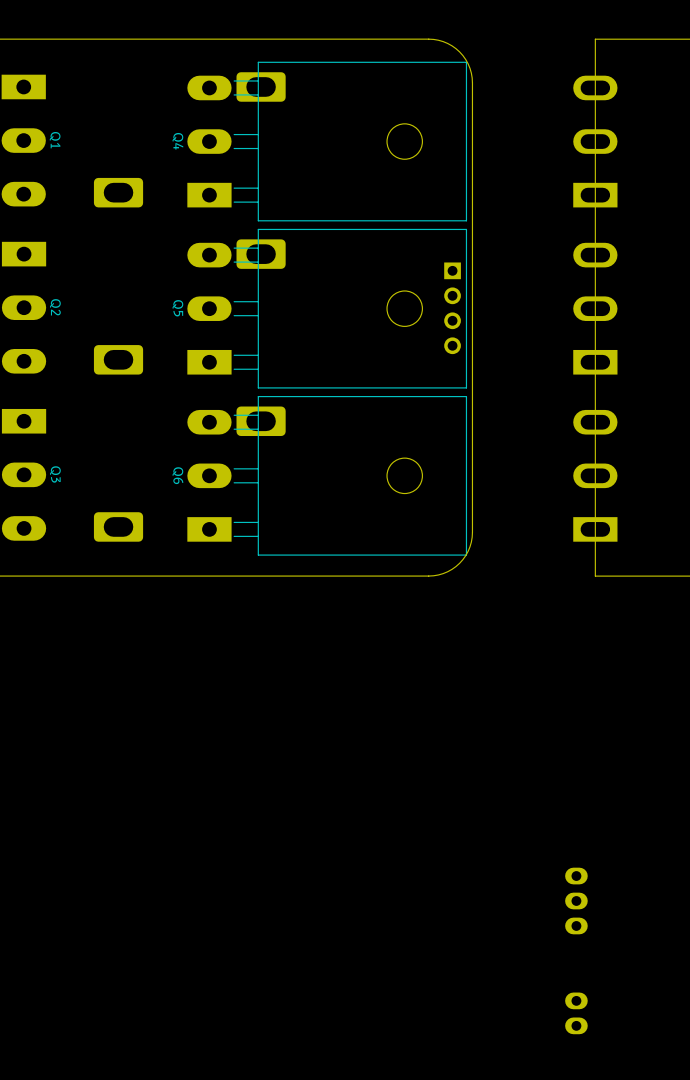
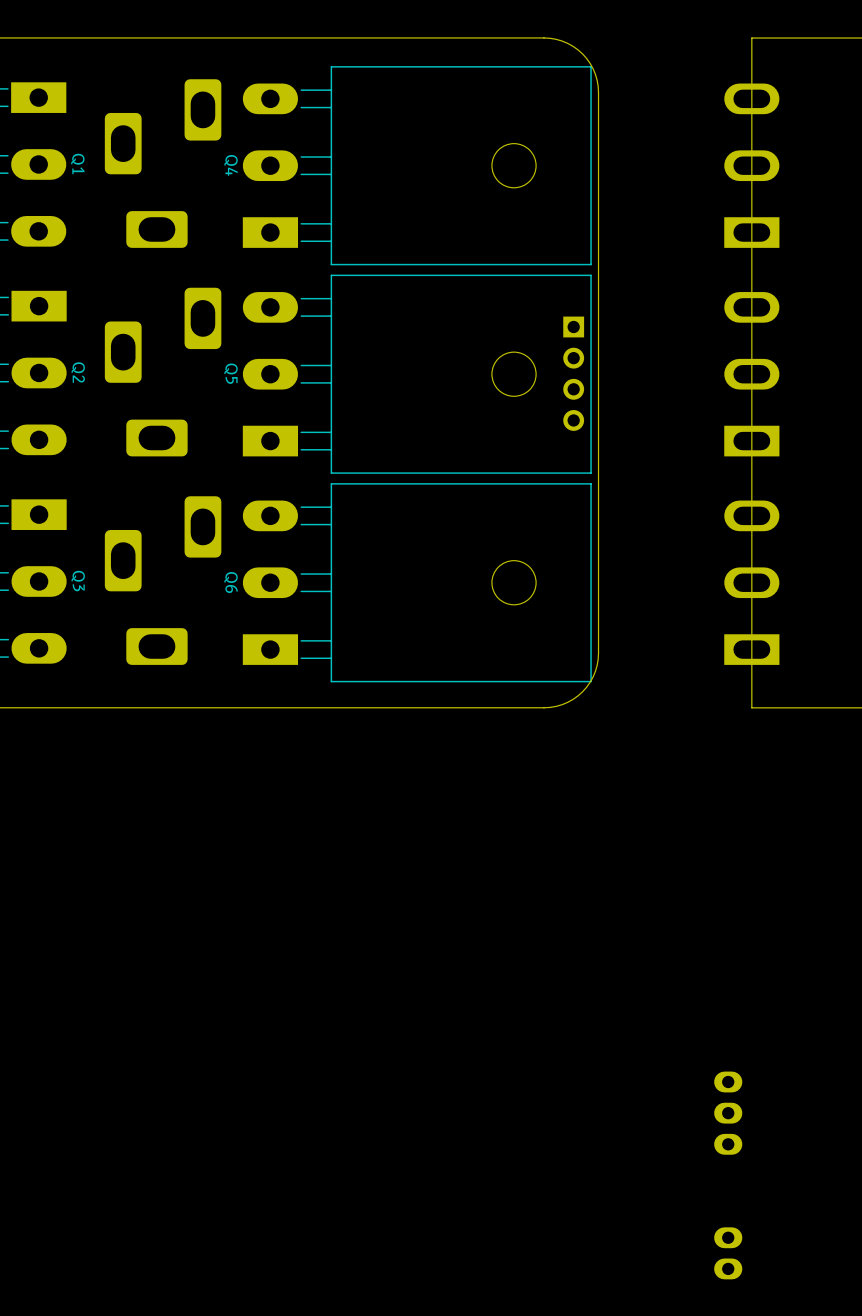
part: (261, 86) -> none
part: none -> (202, 109)
part: none -> (123, 143)
part: (261, 254) -> none
part: none -> (202, 318)
part: none -> (123, 352)
part: (261, 421) -> none
part: none -> (202, 526)
part: none -> (123, 560)

